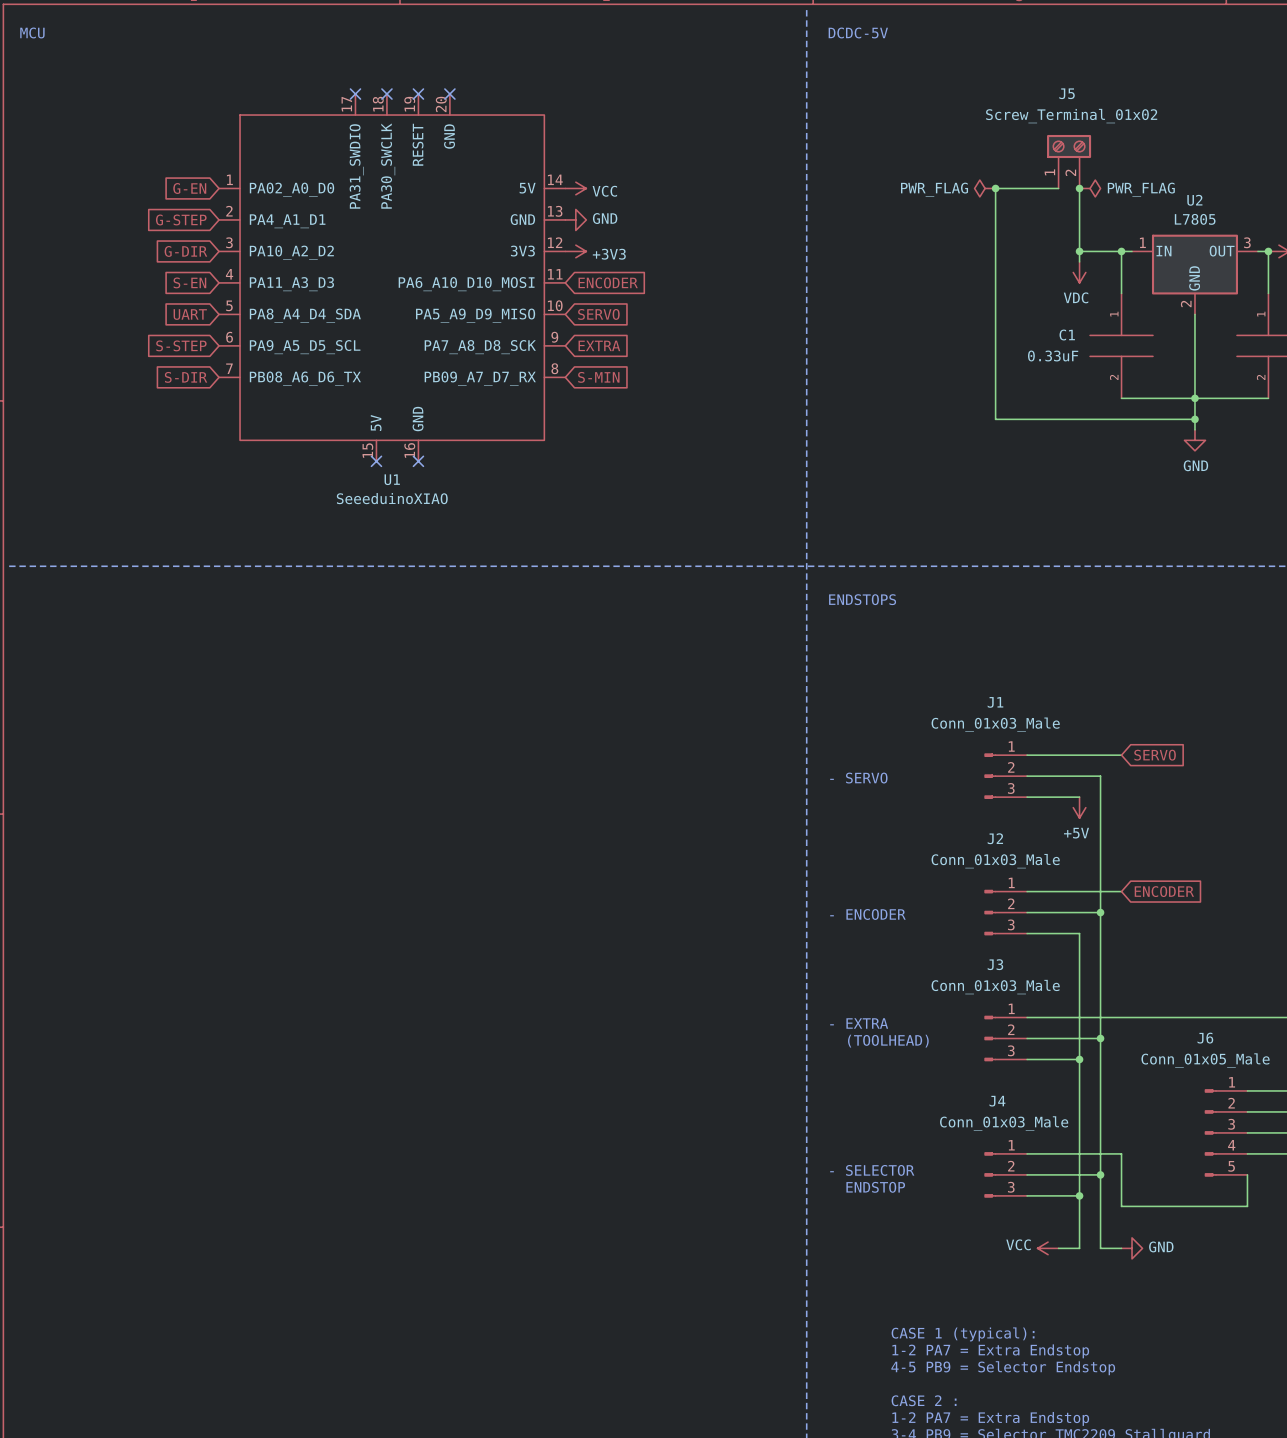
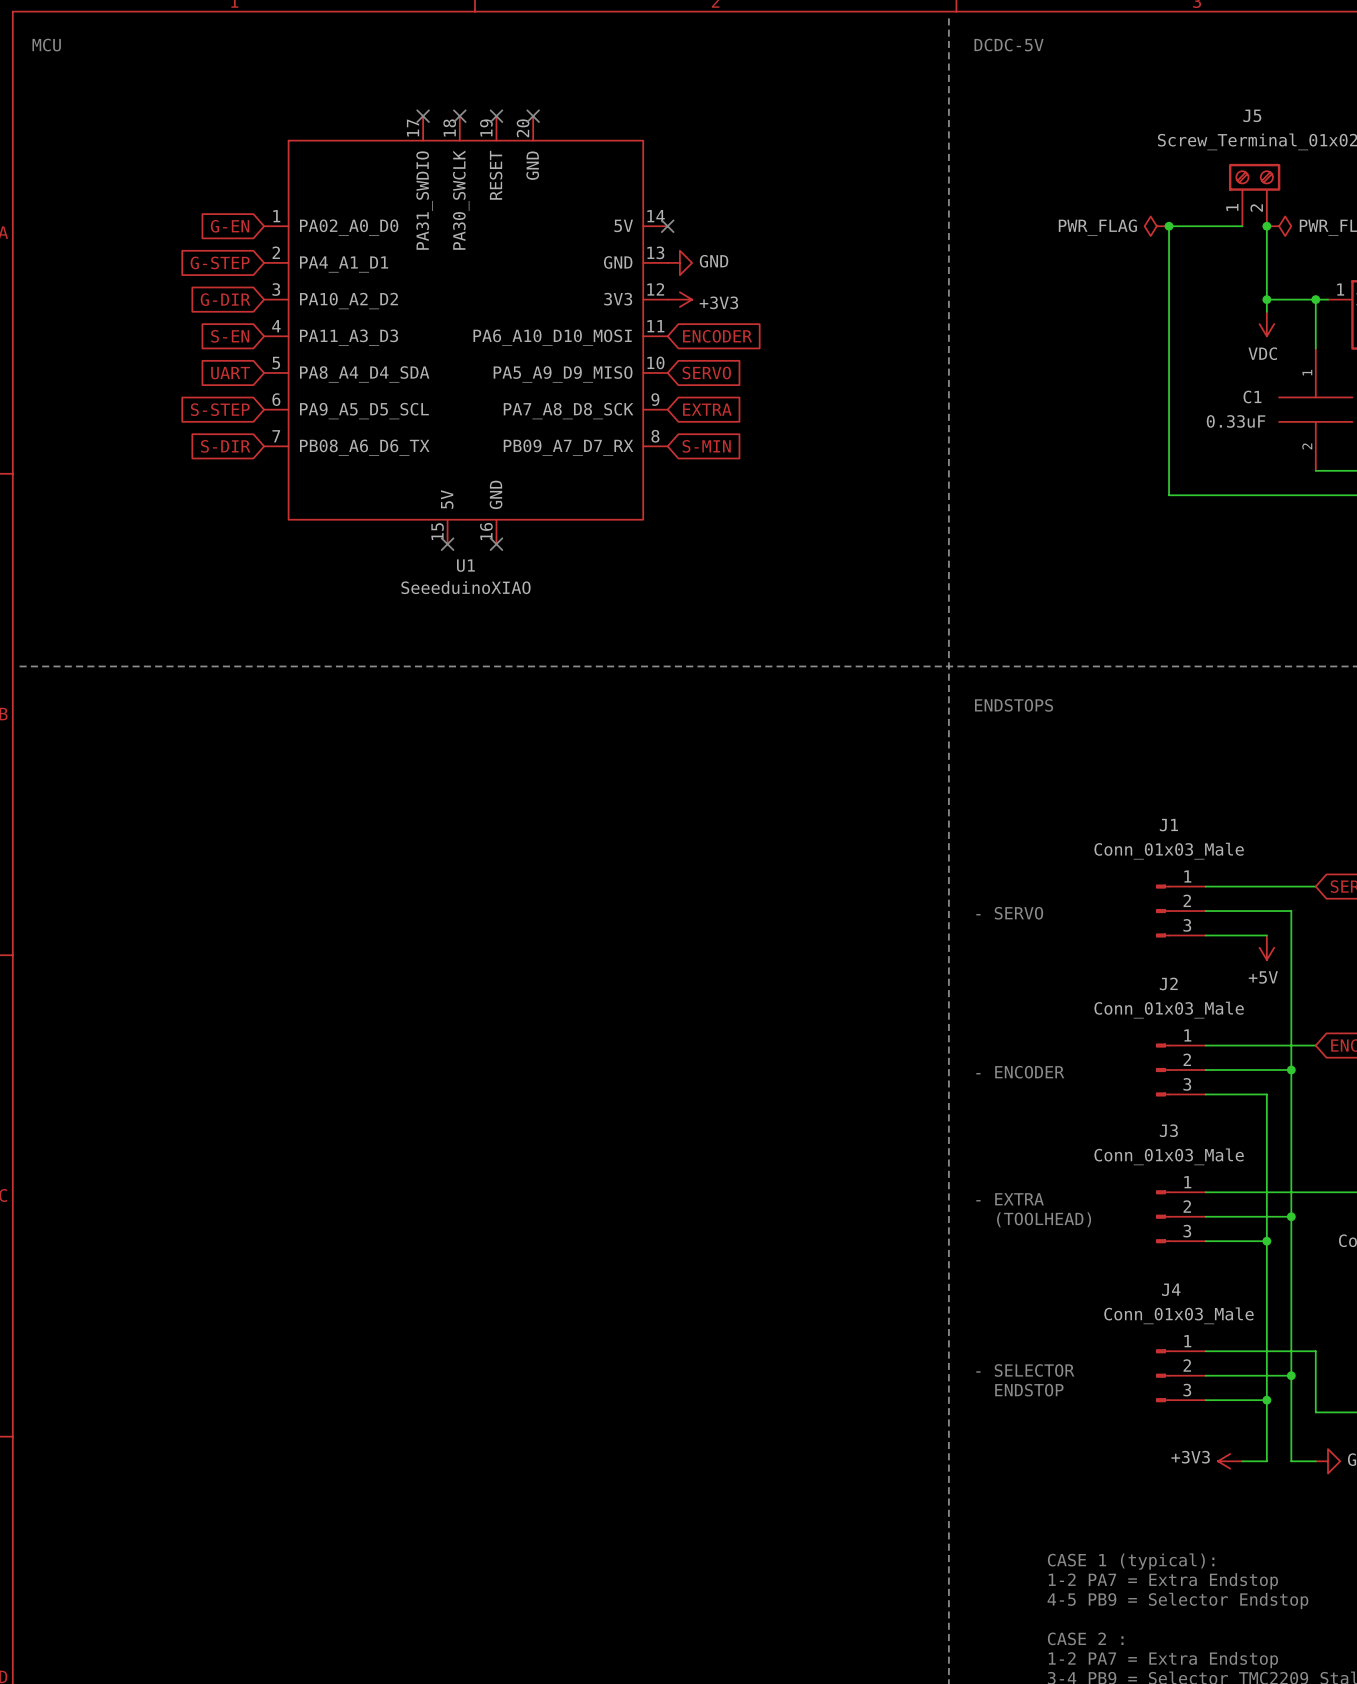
no-connect mark: none -> (667, 226)
power symbol: VCC (575, 188) -> none
power symbol: VCC (1048, 1248) -> +3V3 (1230, 1461)

